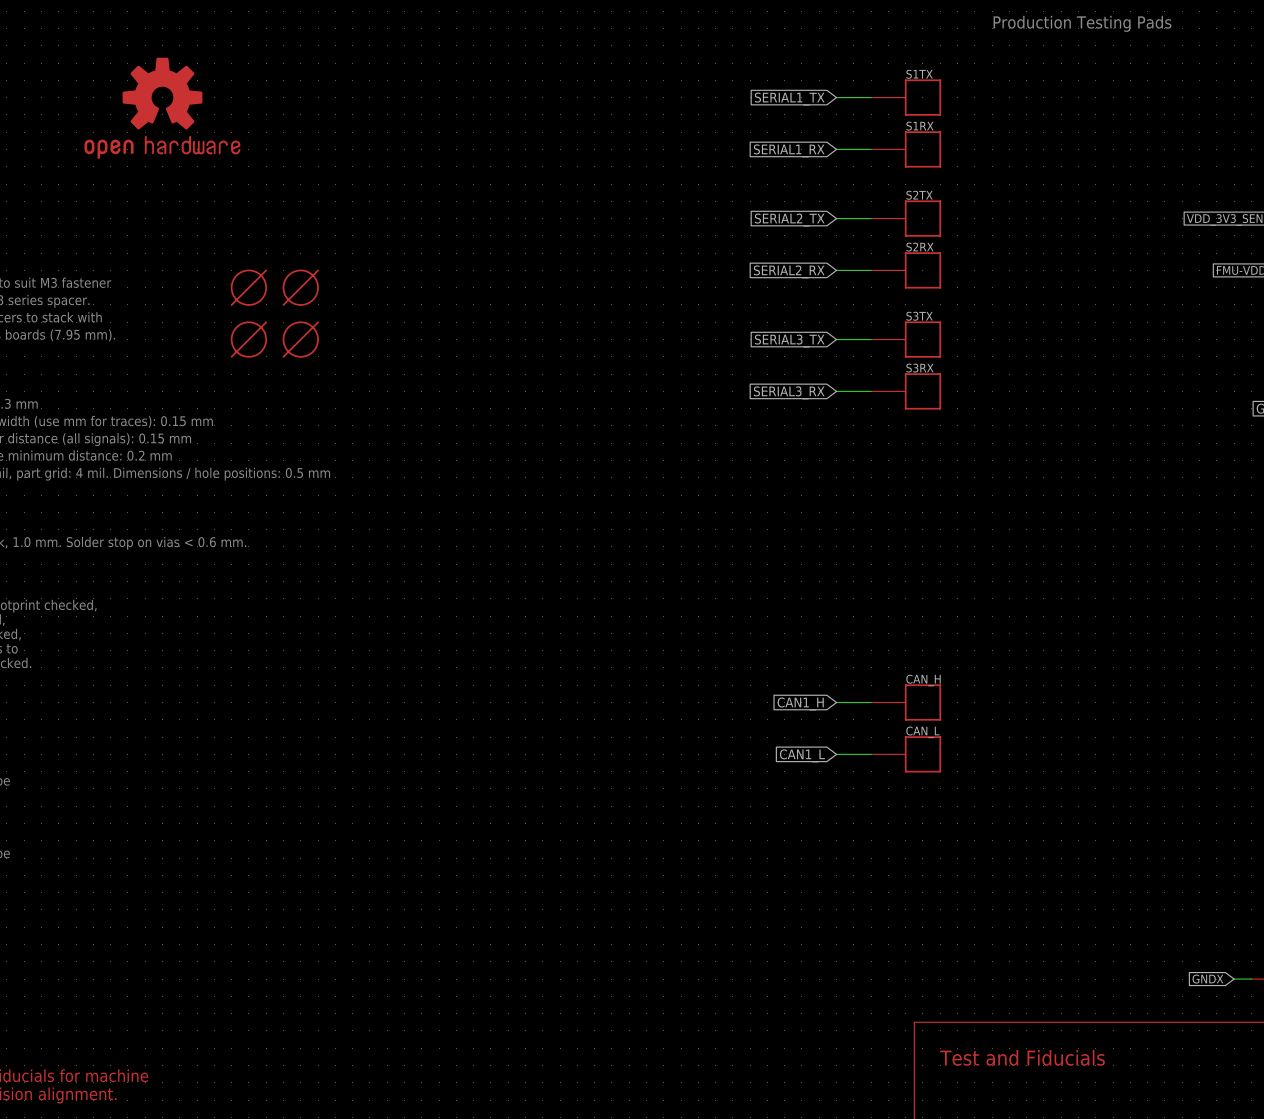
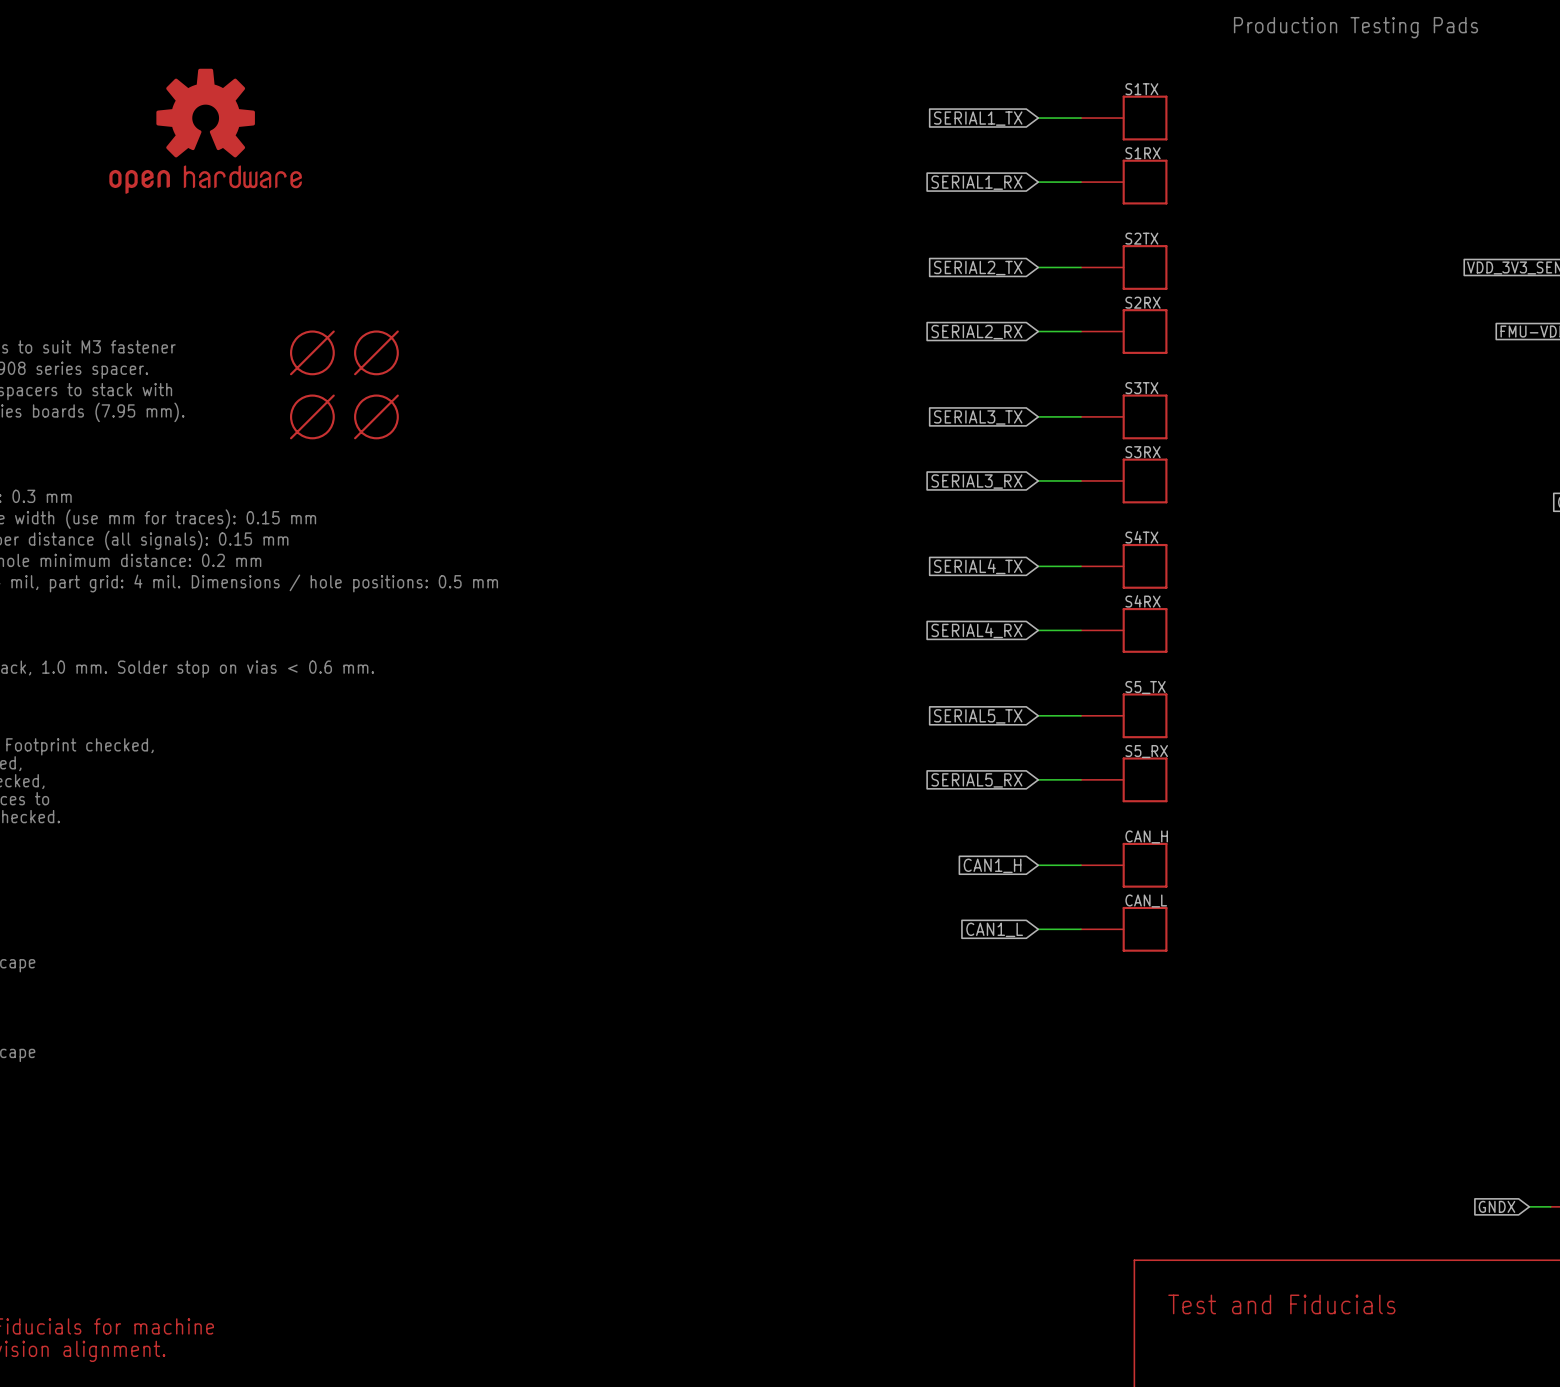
wire: none -> (1038, 566) (1080, 566)
S4TX: none -> (1124, 566)
global label: none -> SERIAL4_TX (978, 566)
wire: none -> (1038, 630) (1080, 630)
S4RX: none -> (1124, 630)
global label: none -> SERIAL4_RX (976, 630)
wire: none -> (1038, 715) (1080, 715)
S5_TX: none -> (1124, 715)
global label: none -> SERIAL5_TX (978, 716)
wire: none -> (1038, 779) (1080, 779)
S5_RX: none -> (1124, 779)
global label: none -> SERIAL5_RX (976, 780)

